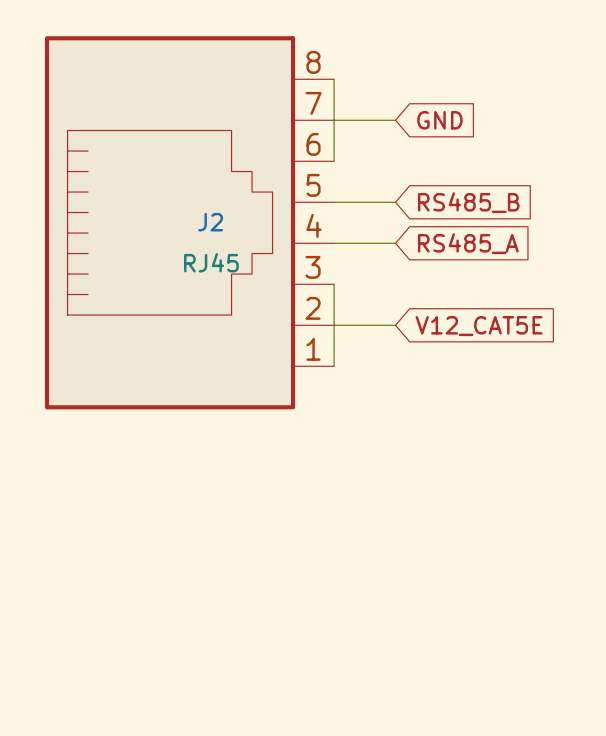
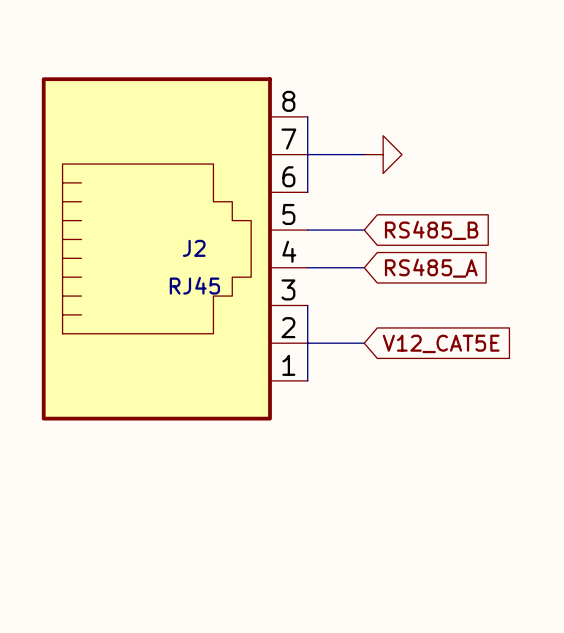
power symbol: none -> (383, 154)
global label: GND (439, 120) -> none

